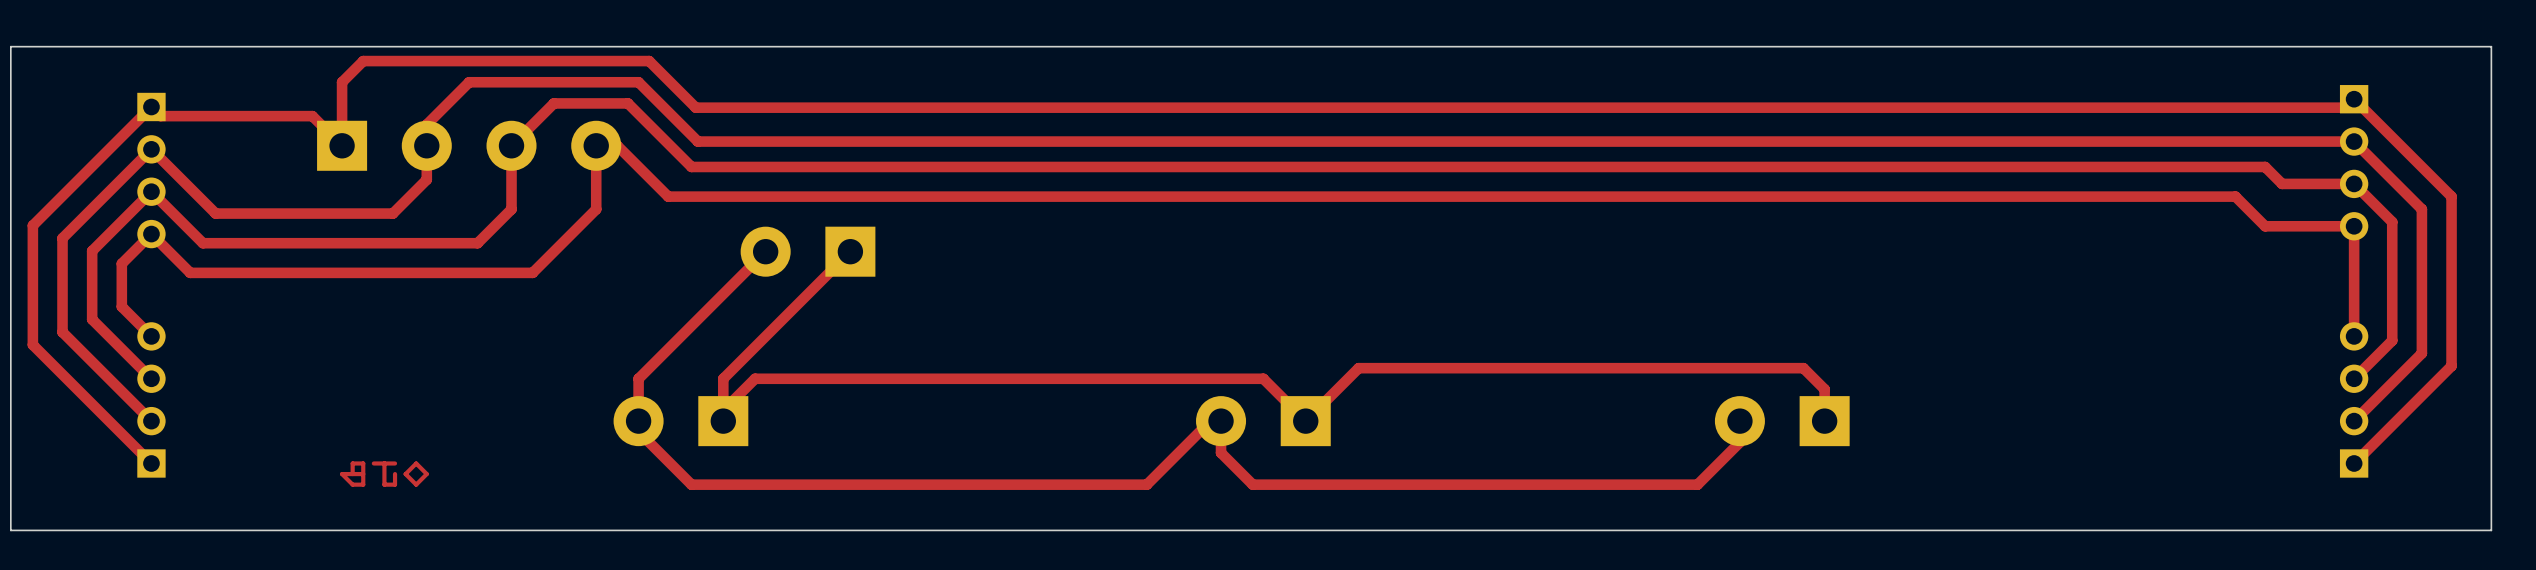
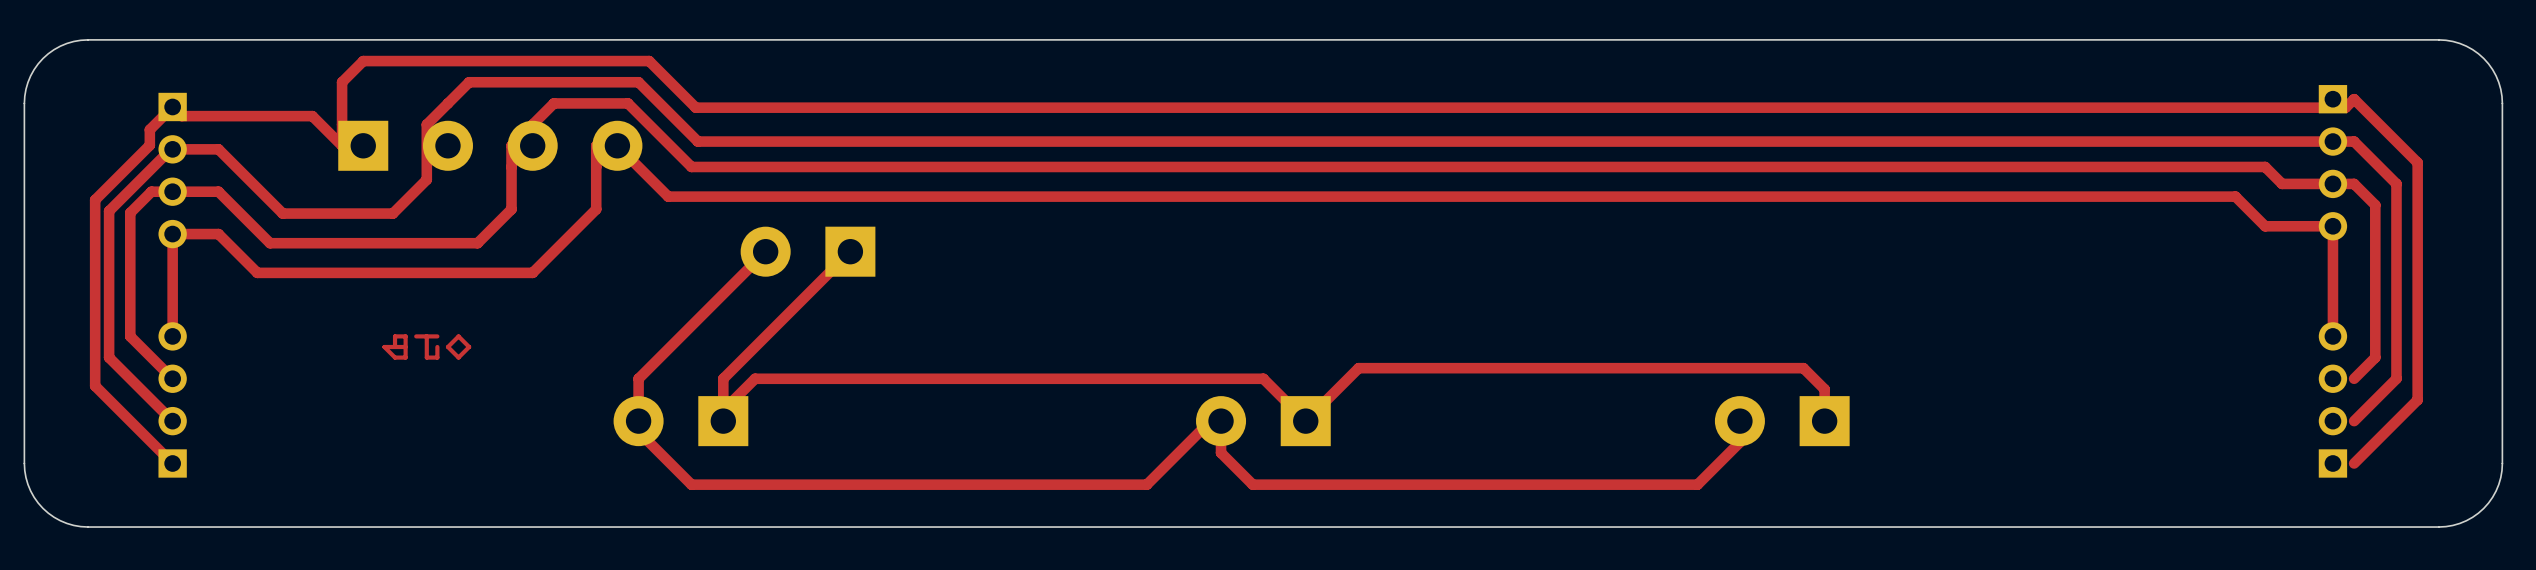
board edge: (2491, 46) (10, 46) (10, 530) (2491, 530) (2491, 46) -> (2438, 39) (2452, 41) (2466, 46) (2483, 58) (2496, 75) (2500, 89) (2502, 103) (2501, 470) (2498, 484) (2488, 503) (2472, 517) (2452, 525) (2438, 527) (87, 527) (66, 523) (48, 513) (34, 497) (25, 477) (24, 463) (24, 96) (30, 75) (42, 58) (54, 49) (73, 41) (87, 39) (2438, 39)
top track: (181, 116) (160, 116) (151, 106) (32, 225) (32, 344) (151, 463) -> (181, 116) (172, 106) (149, 129) (149, 145) (95, 199) (95, 386) (172, 463)
part position: (469, 145) -> (490, 145)
part position: (2354, 162) -> (2332, 162)
top track: (2417, 162) (2451, 196) (2451, 366) (2417, 399) -> (2417, 162) (2417, 399)
part position: (151, 170) -> (172, 170)
top track: (2396, 183) (2421, 209) (2421, 353) (2396, 378) -> (2396, 183) (2396, 378)
top track: (151, 191) (202, 243) (270, 243) -> (151, 191) (218, 191) (270, 243)
top track: (2375, 205) (2392, 222) (2392, 340) (2375, 357) -> (2375, 205) (2375, 357)
top track: (130, 212) (92, 251) (92, 319) (151, 378) -> (130, 212) (130, 336) (172, 378)
top track: (282, 213) (215, 213) (151, 149) (62, 238) (62, 332) (151, 421) -> (282, 213) (218, 149) (170, 149) (109, 211) (109, 357) (172, 421)
top track: (2332, 226) (2354, 226) (2354, 336) -> (2332, 226) (2332, 336)
top track: (257, 272) (190, 272) (151, 234) (121, 263) (121, 306) (151, 336) -> (257, 272) (218, 234) (172, 234) (172, 336)
part position: (151, 399) -> (172, 399)
part position: (2354, 399) -> (2332, 399)
top track: (384, 463) (384, 484) (395, 484) (395, 474) -> (426, 336) (426, 357) (437, 357) (437, 347)
top track: (395, 463) (373, 463) -> (437, 336) (416, 336)
top track: (416, 463) (405, 474) (416, 484) (426, 474) (416, 463) -> (458, 336) (447, 347) (458, 357) (469, 347) (458, 336)
top track: (363, 474) (342, 474) (352, 484) (363, 484) (363, 463) (352, 463) (352, 474) -> (405, 347) (384, 347) (395, 357) (405, 357) (405, 336) (395, 336) (395, 347)

